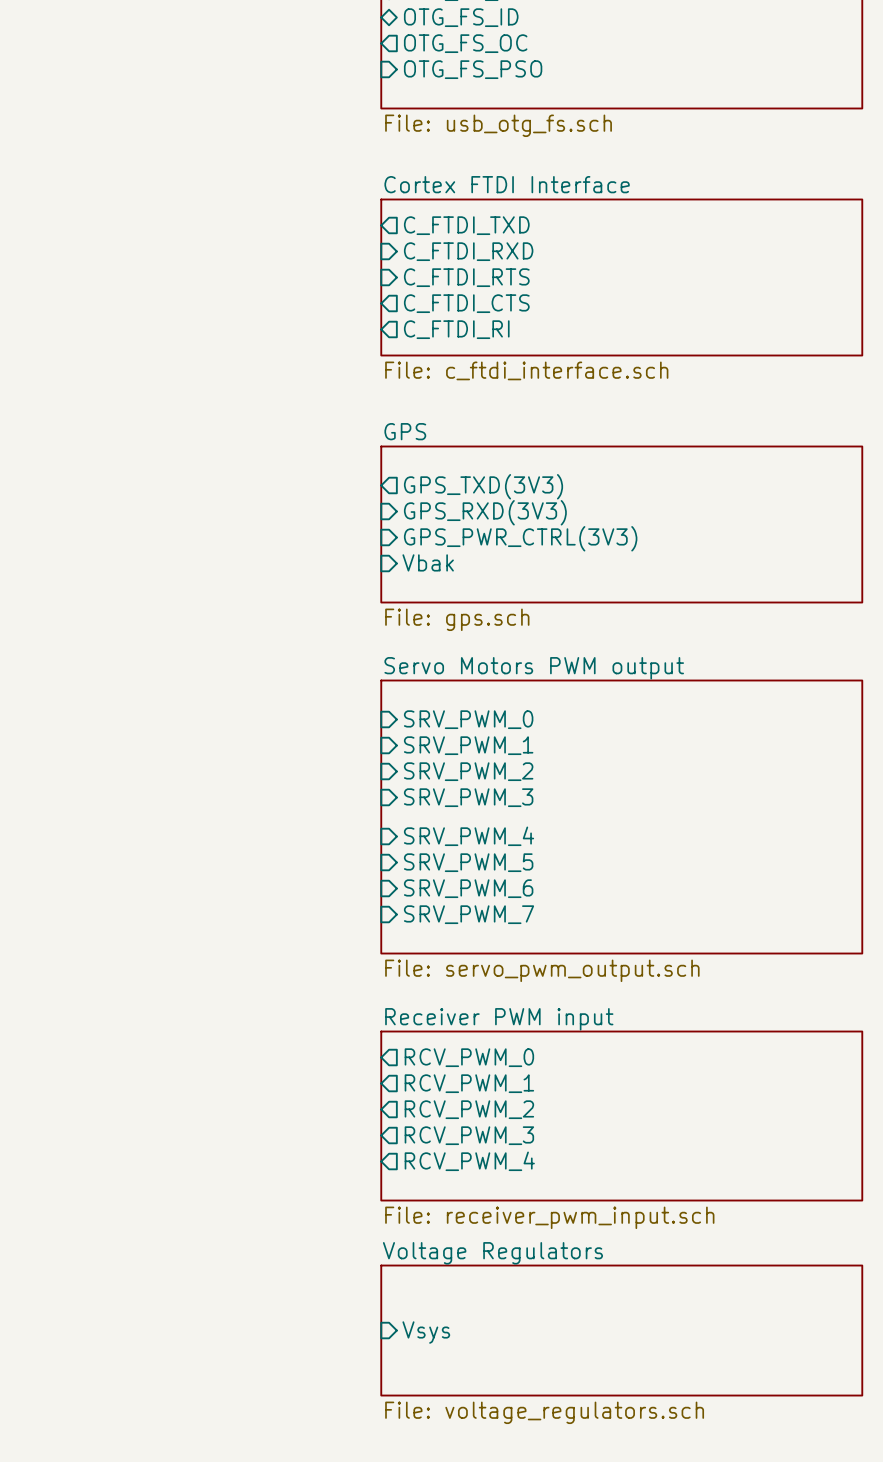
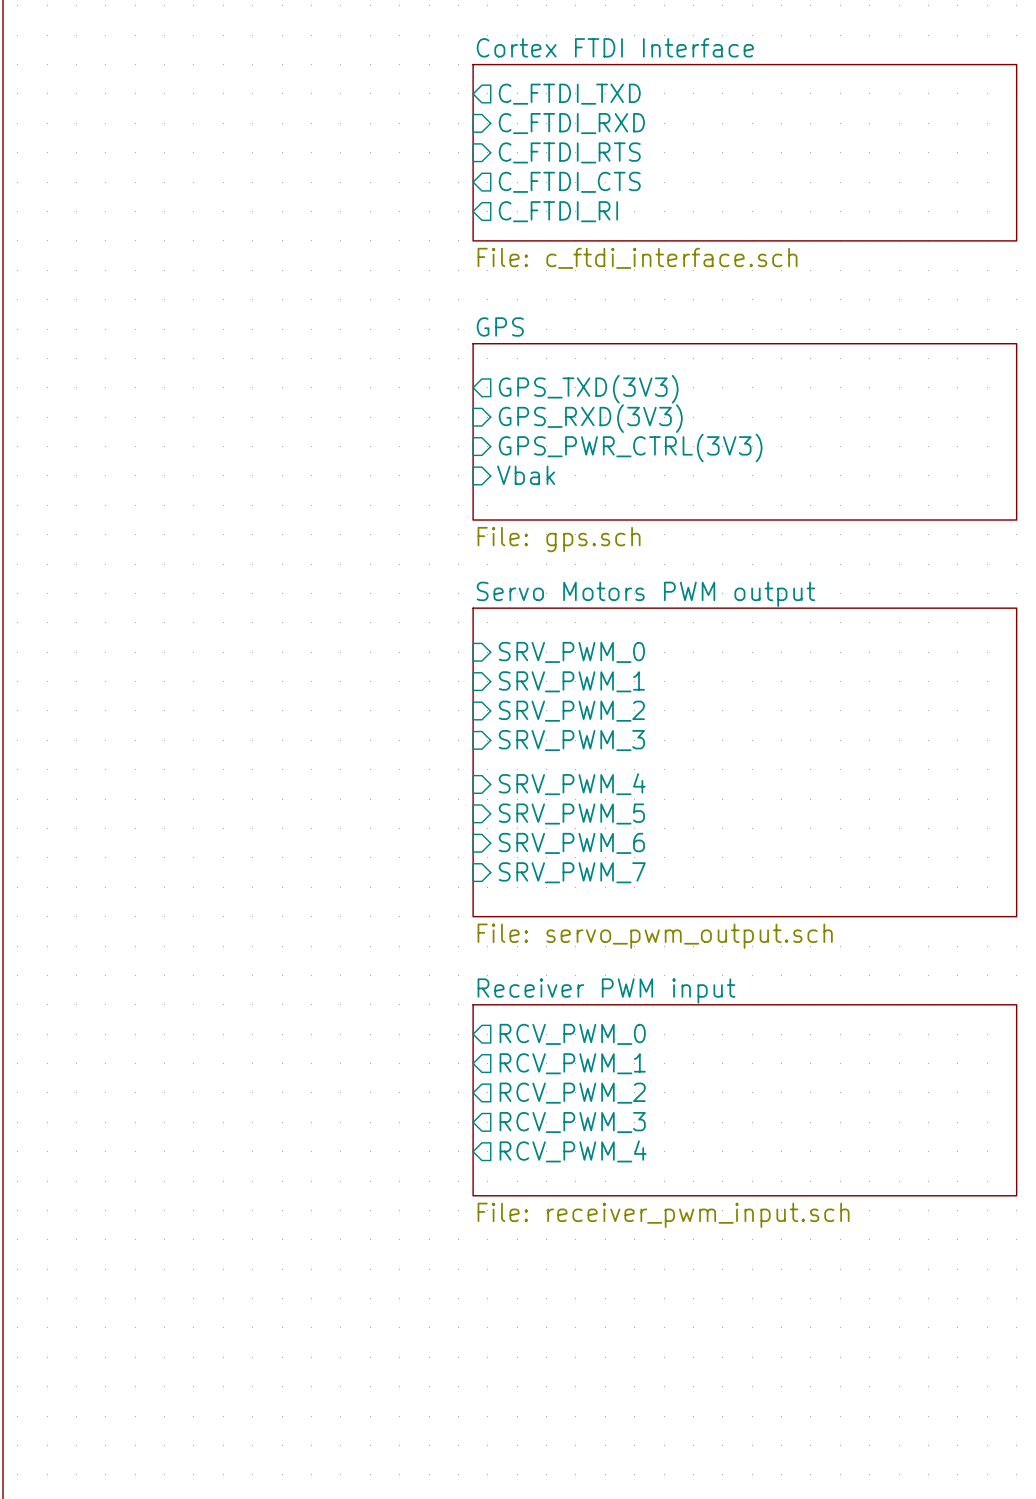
sheet Voltage Regulators: File: voltage_regulators.sch (621, 1330) -> none
sheet pin: Vsys (426, 1332) -> none

